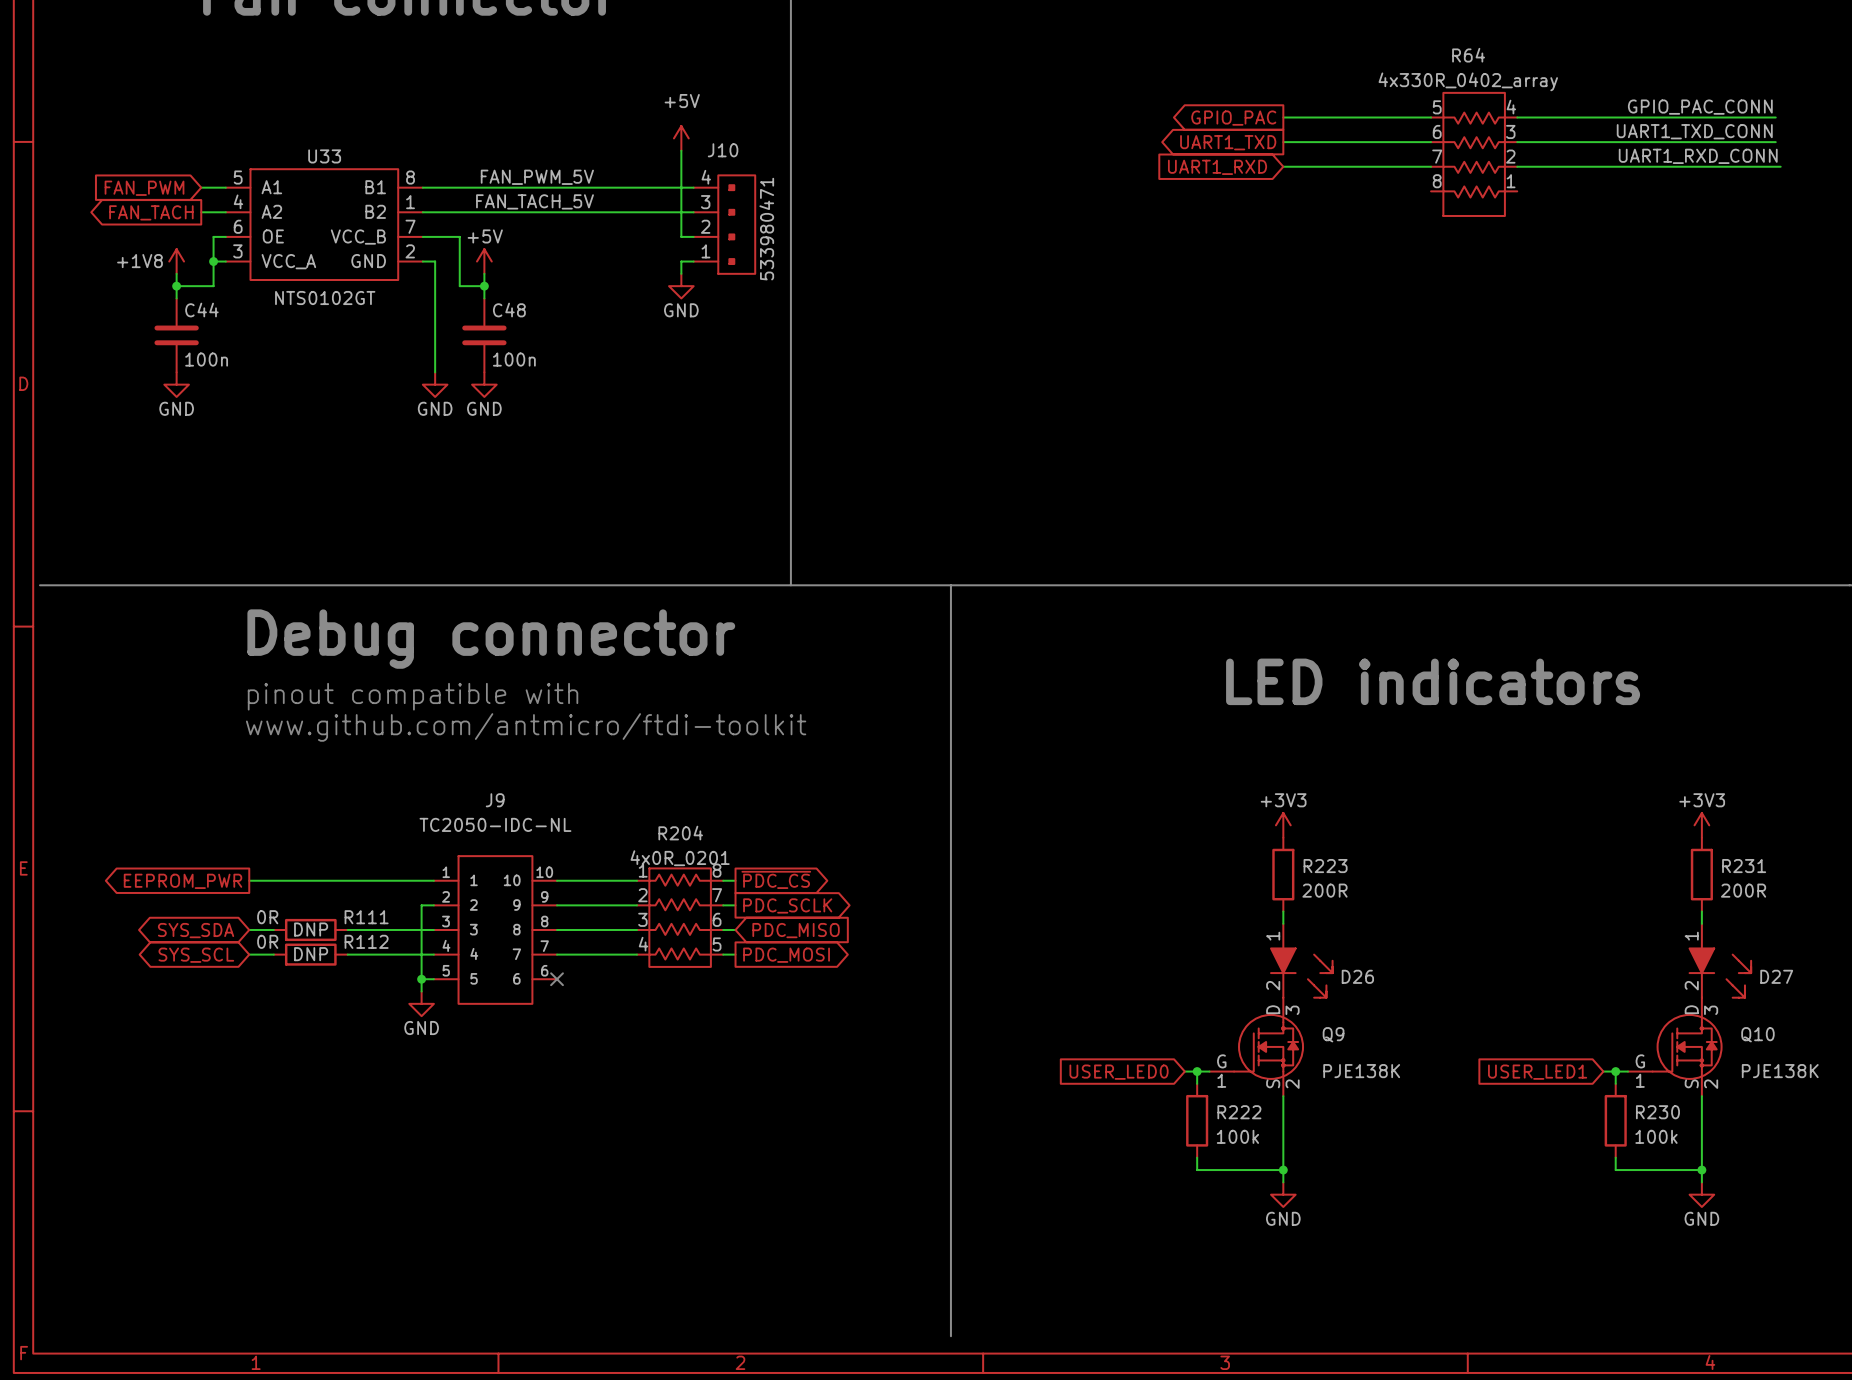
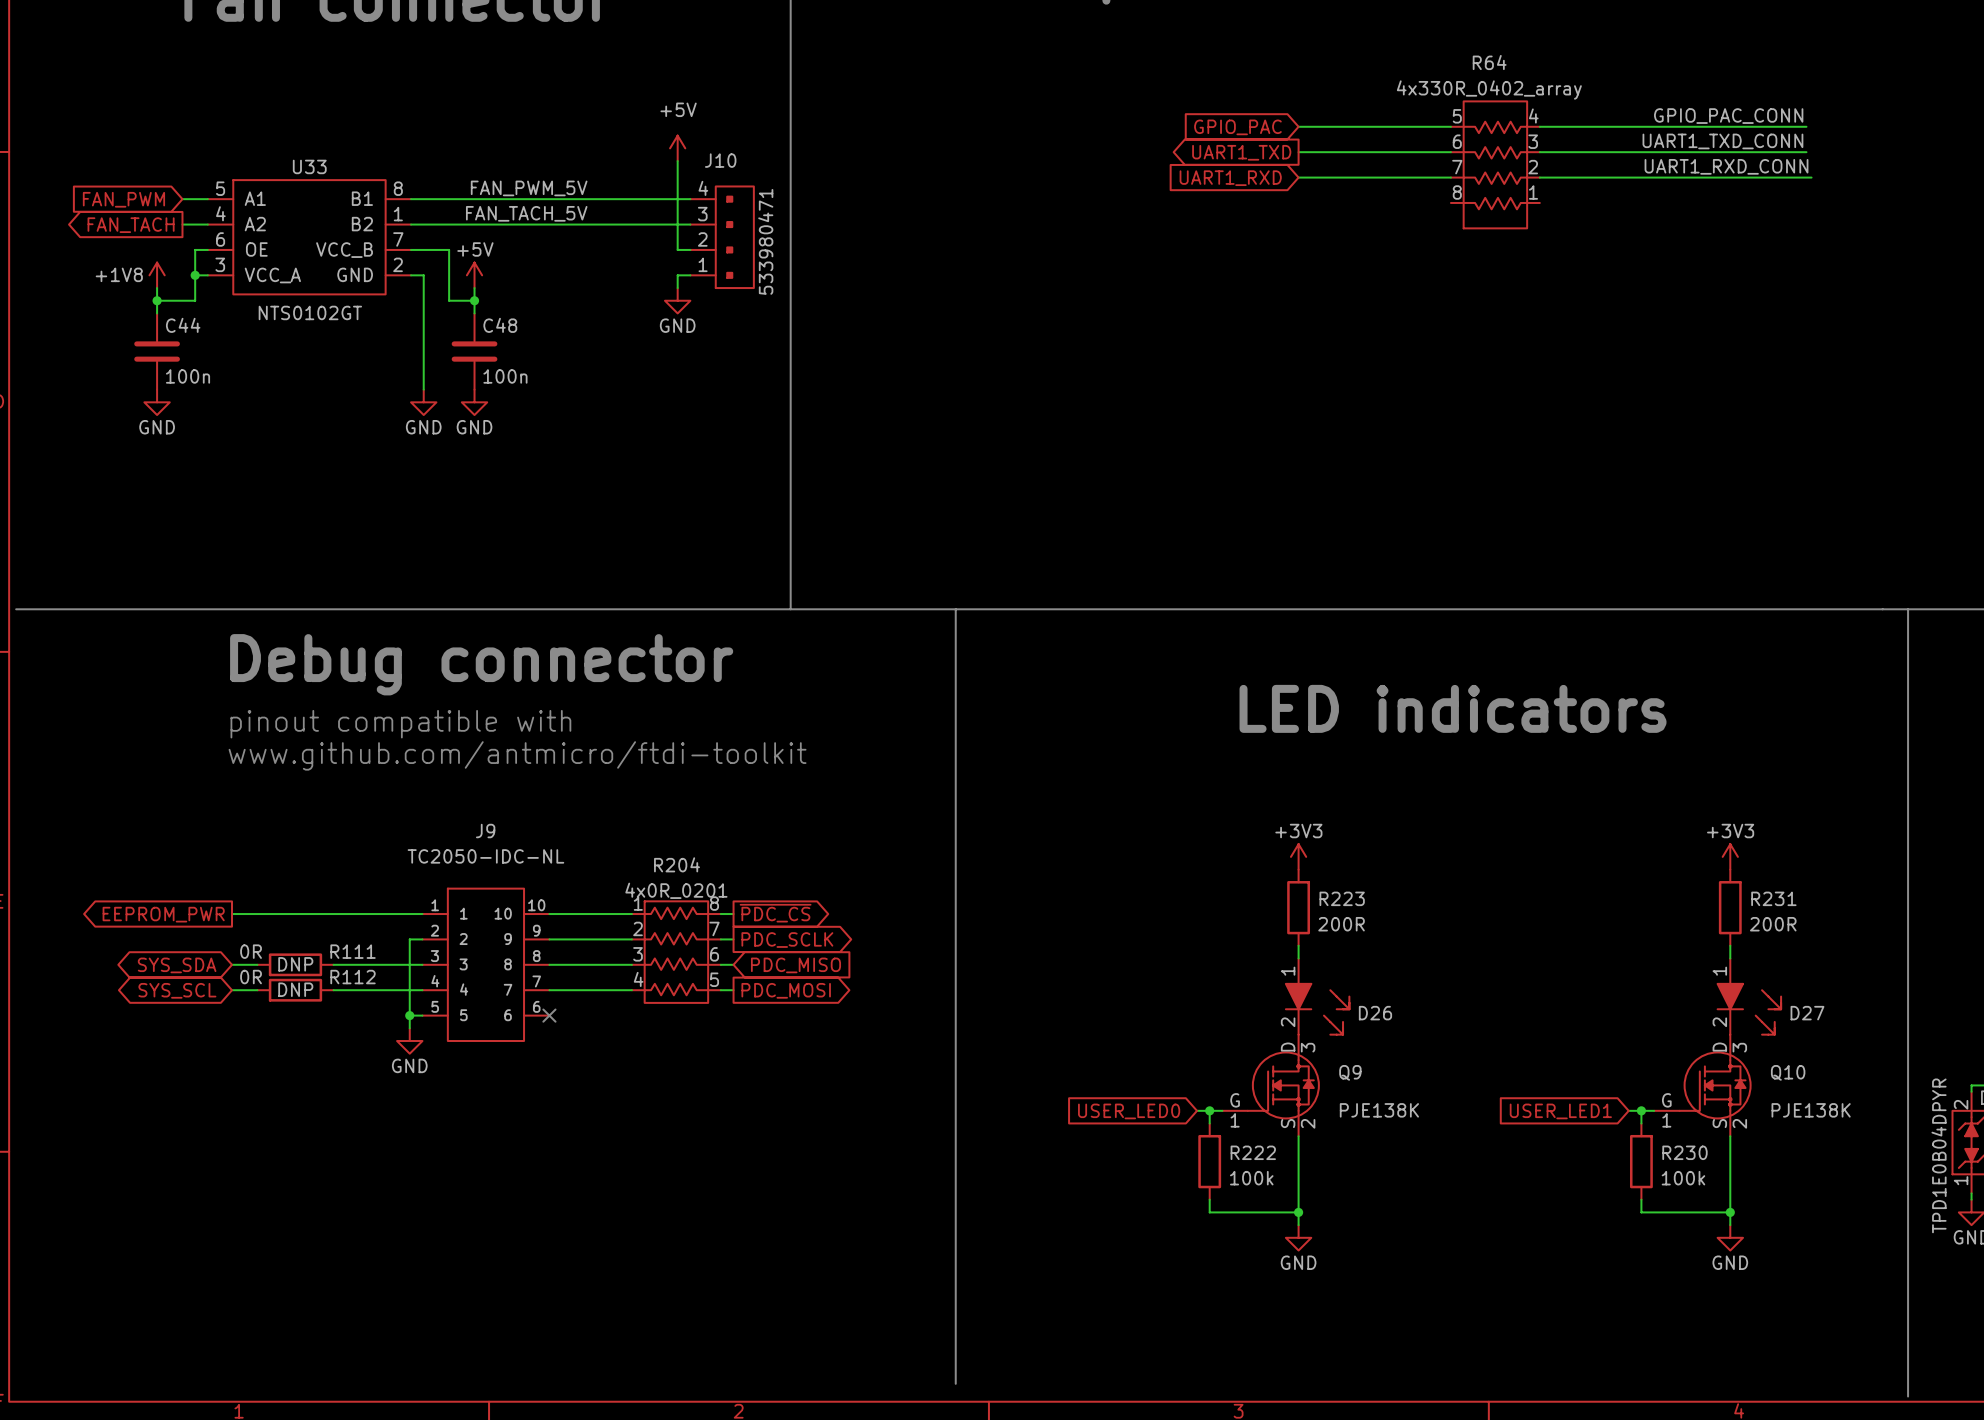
global label shape: output (1233, 118) -> input (1237, 127)

